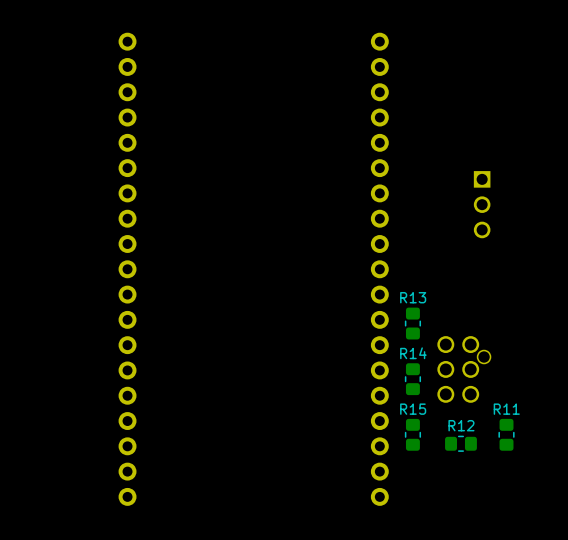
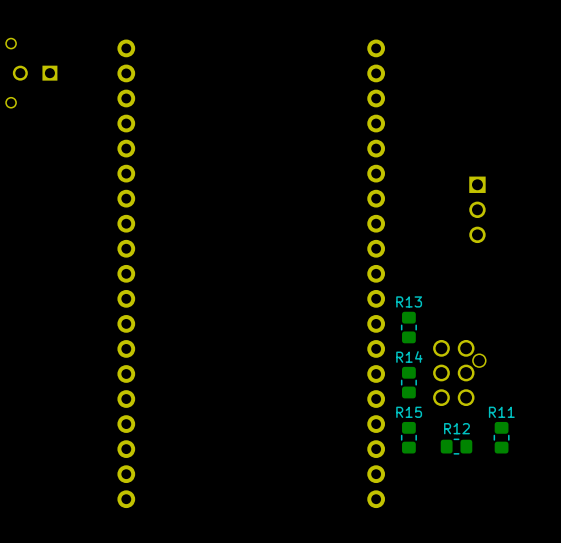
part: none -> (31, 73)

